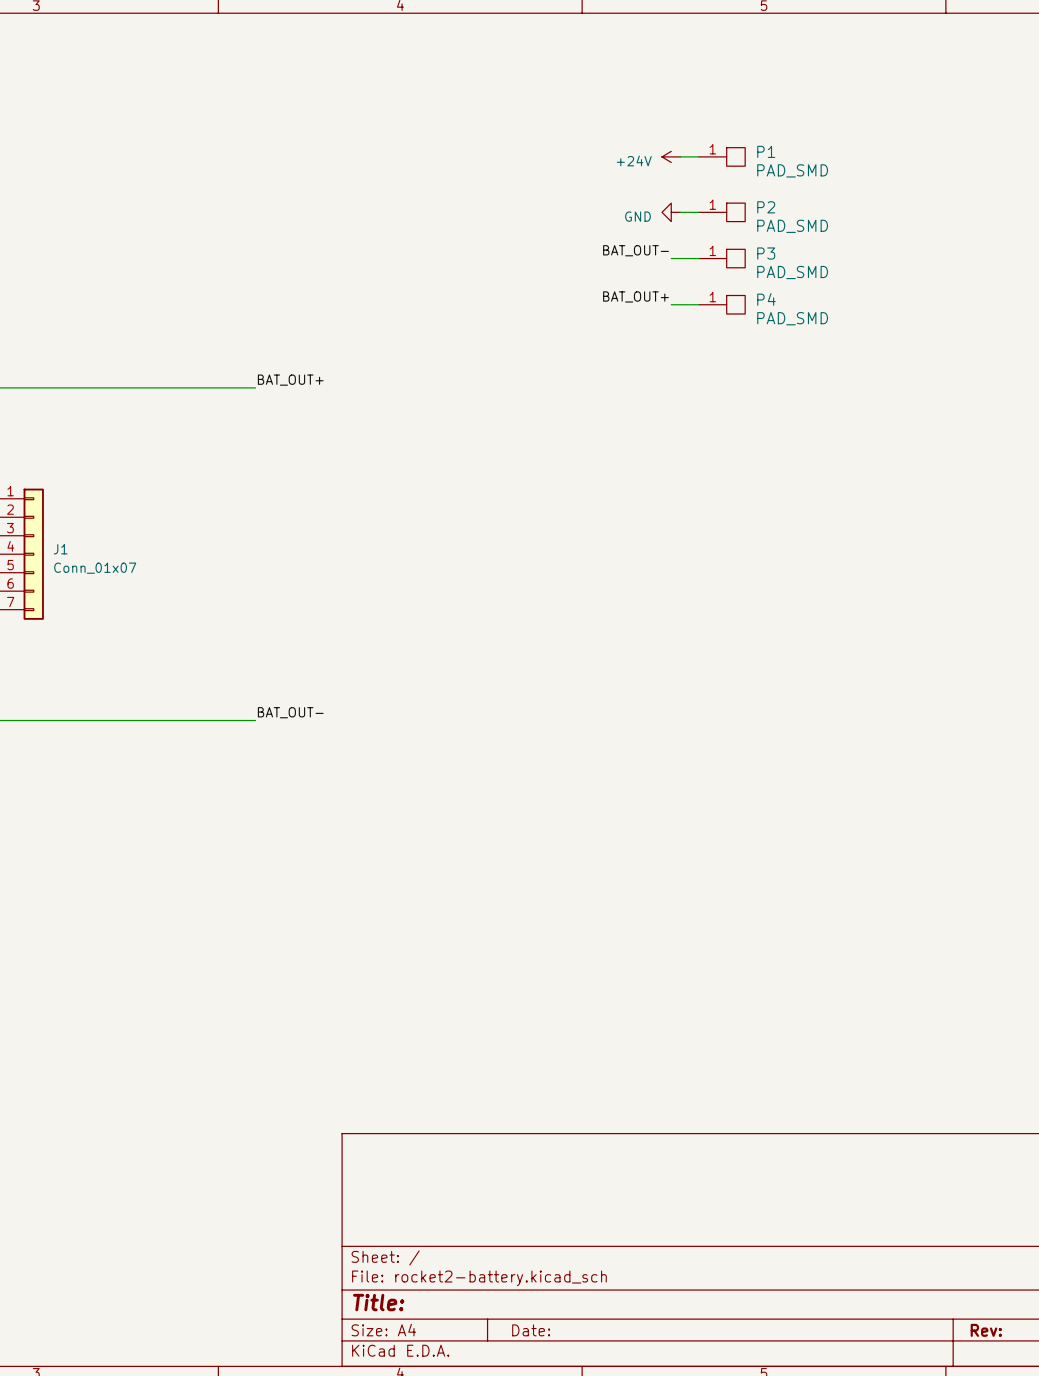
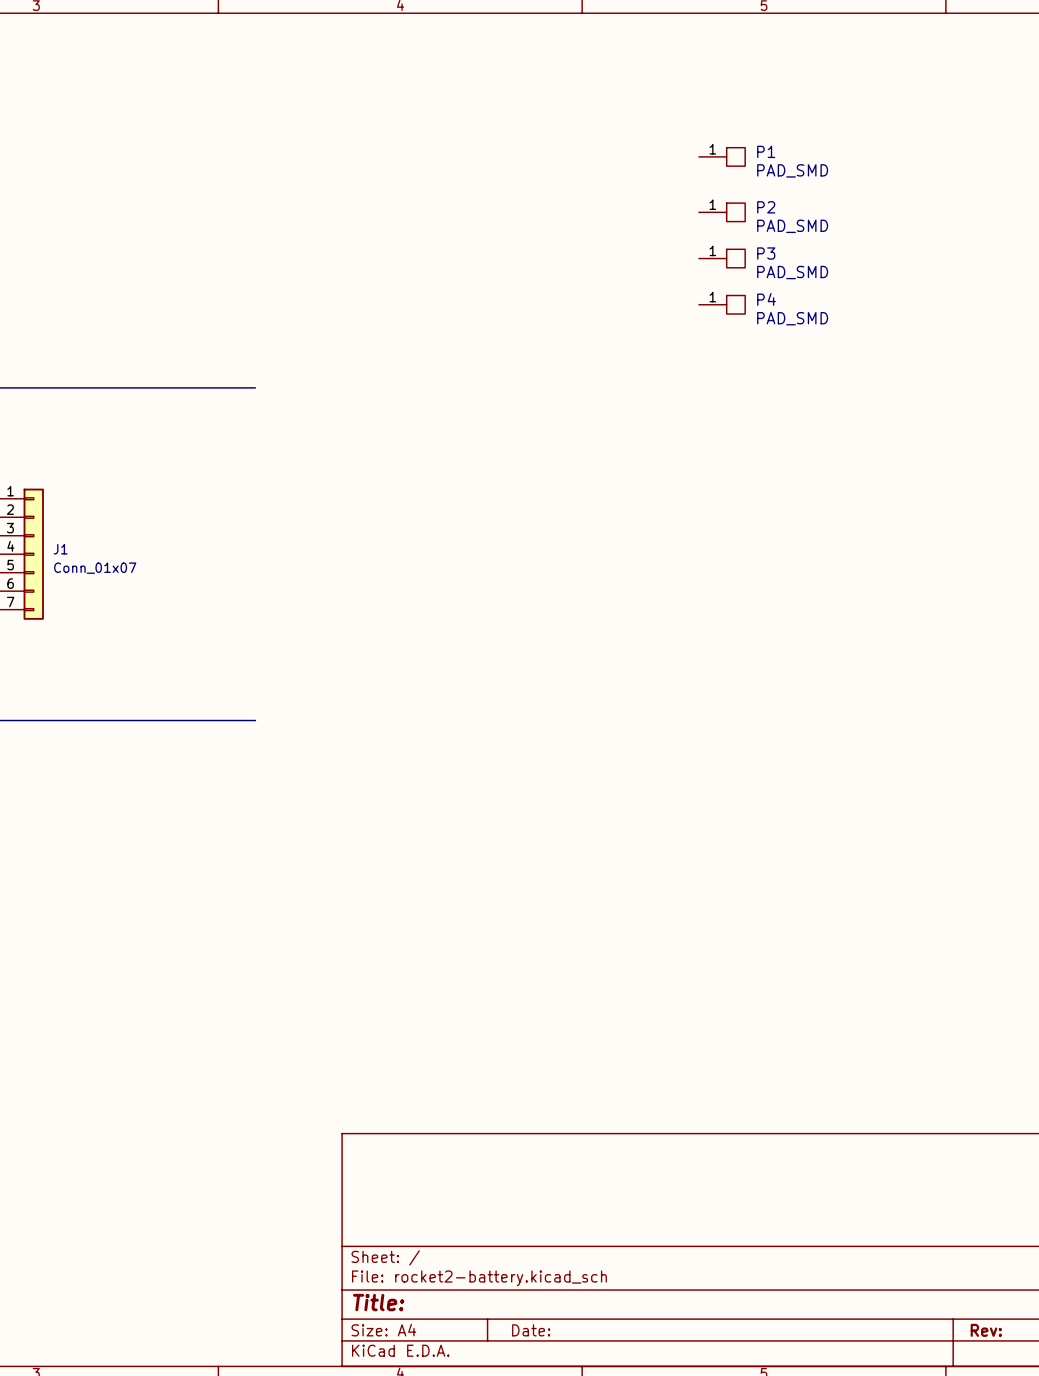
power symbol: +24V (671, 156) -> none
wire: (680, 156) (698, 156) -> none
power symbol: GND (671, 212) -> none
wire: (680, 212) (698, 212) -> none
label: BAT_OUT- (635, 250) -> none
wire: (671, 258) (698, 258) -> none
label: BAT_OUT+ (635, 296) -> none
wire: (671, 304) (698, 304) -> none
label: BAT_OUT+ (290, 380) -> none
label: BAT_OUT- (290, 712) -> none

